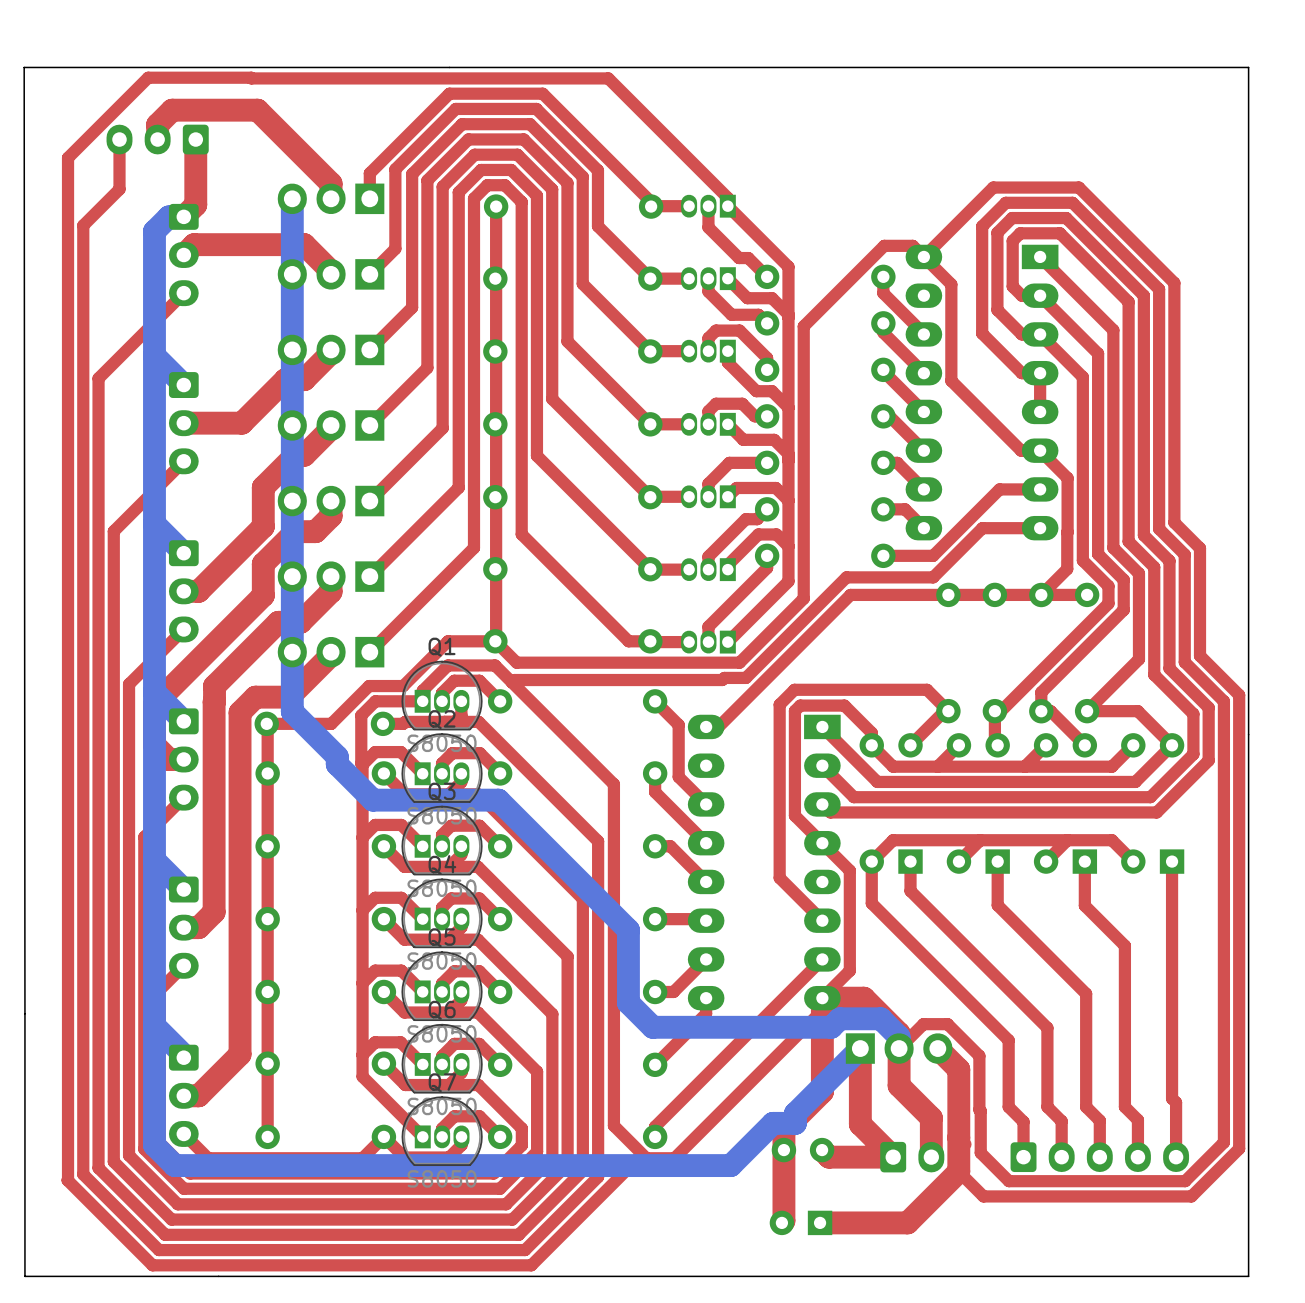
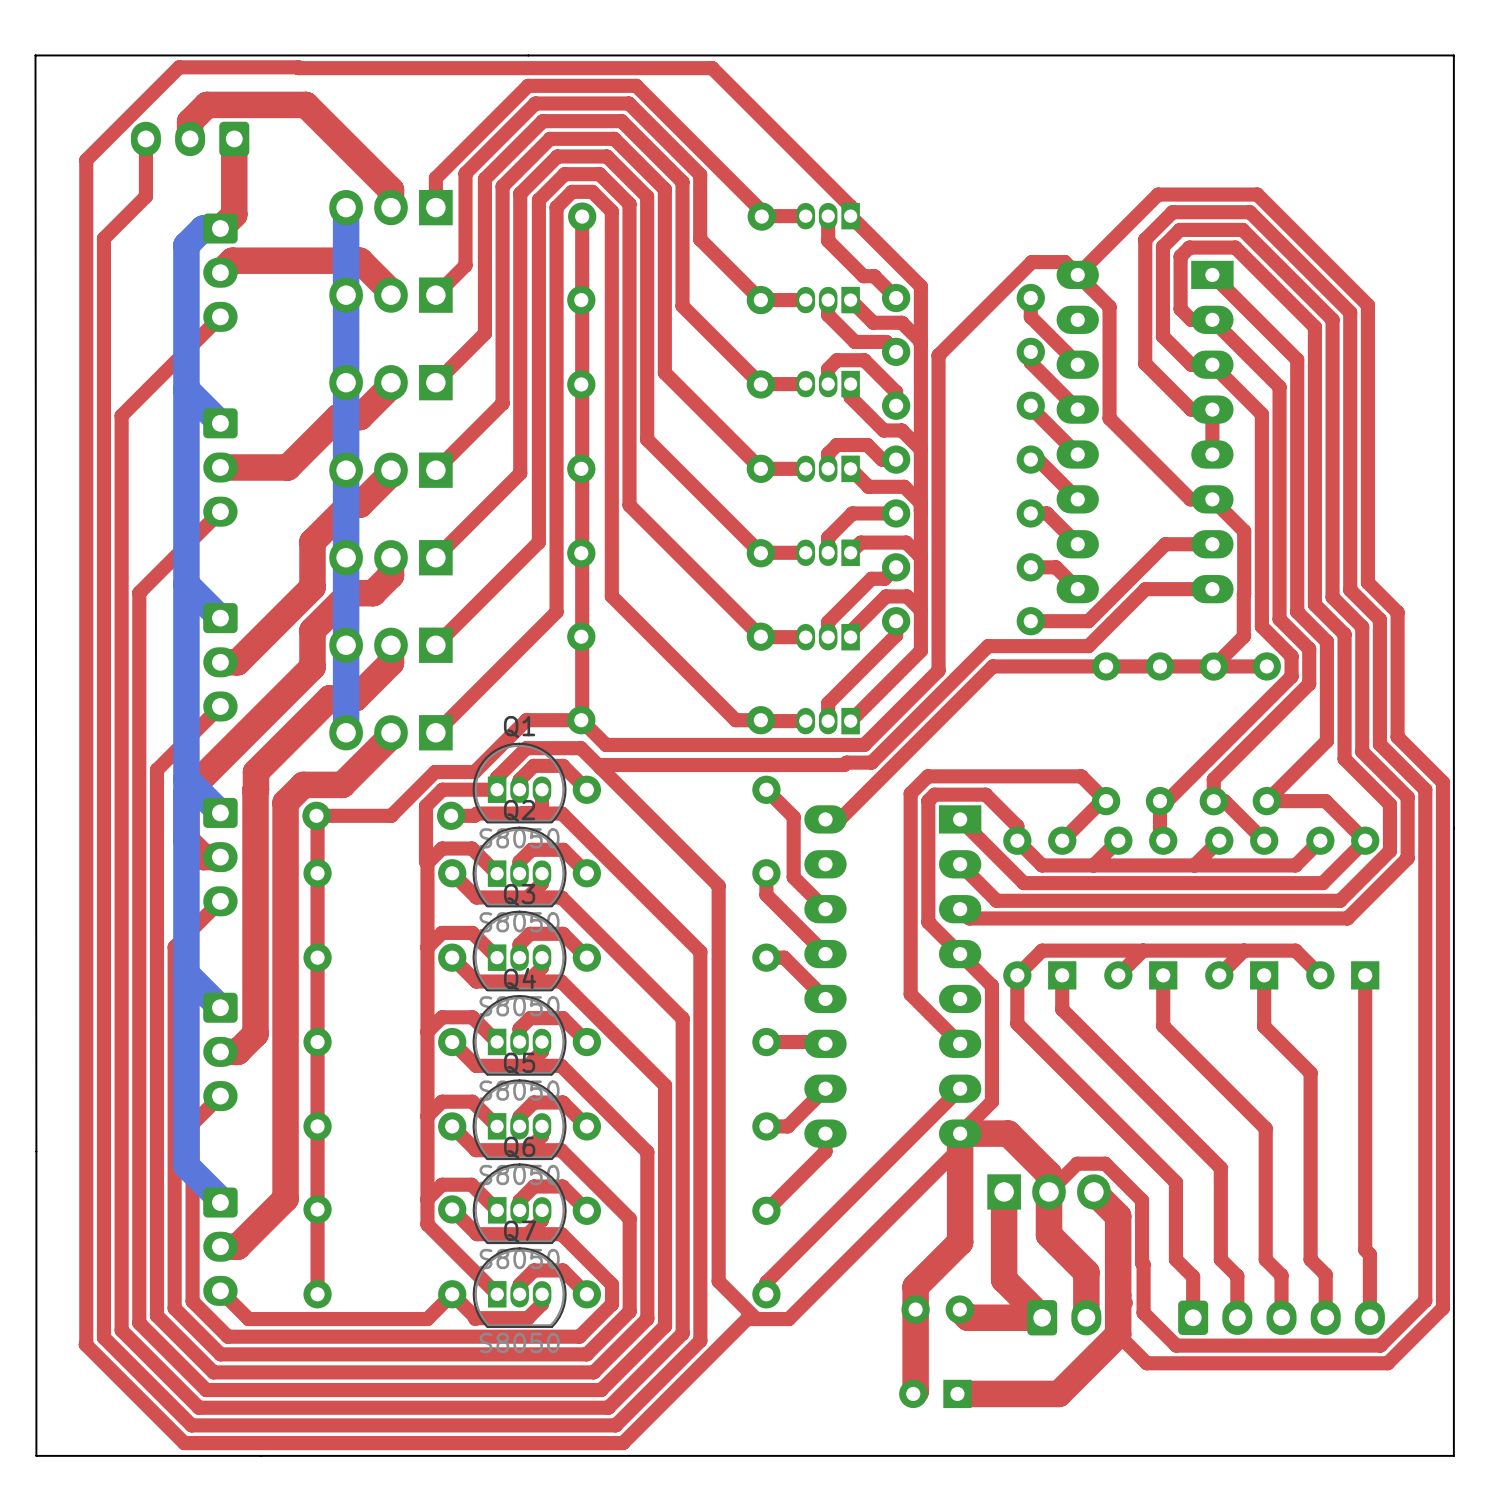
bottom track: (292, 652) (292, 711) (337, 756) (337, 764) (372, 800) (498, 800) (628, 930) (628, 1002) (652, 1027) (831, 1027) (839, 1018) (880, 1018) (899, 1037) (899, 1048) -> none
bottom track: (154, 1025) (154, 1145) (174, 1165) (730, 1165) (772, 1123) (795, 1123) (795, 1113) (860, 1048) -> none

